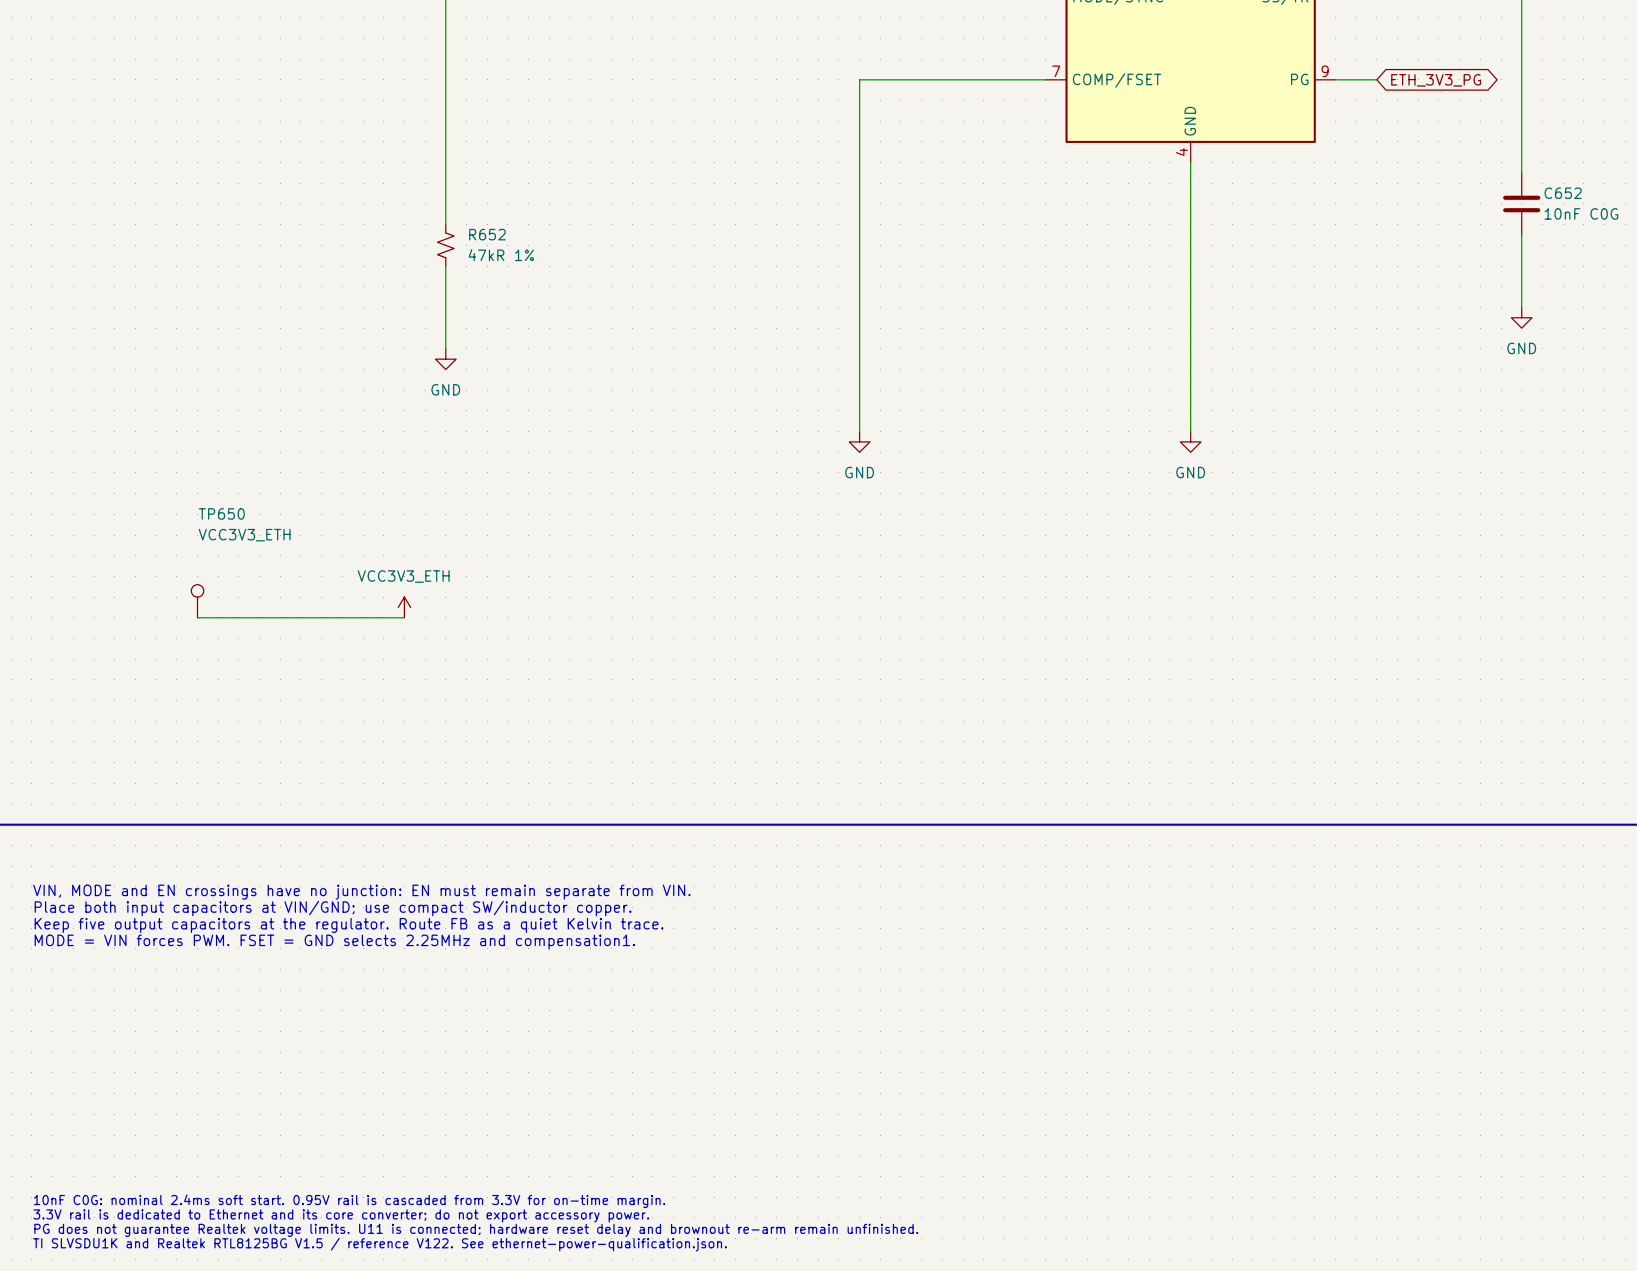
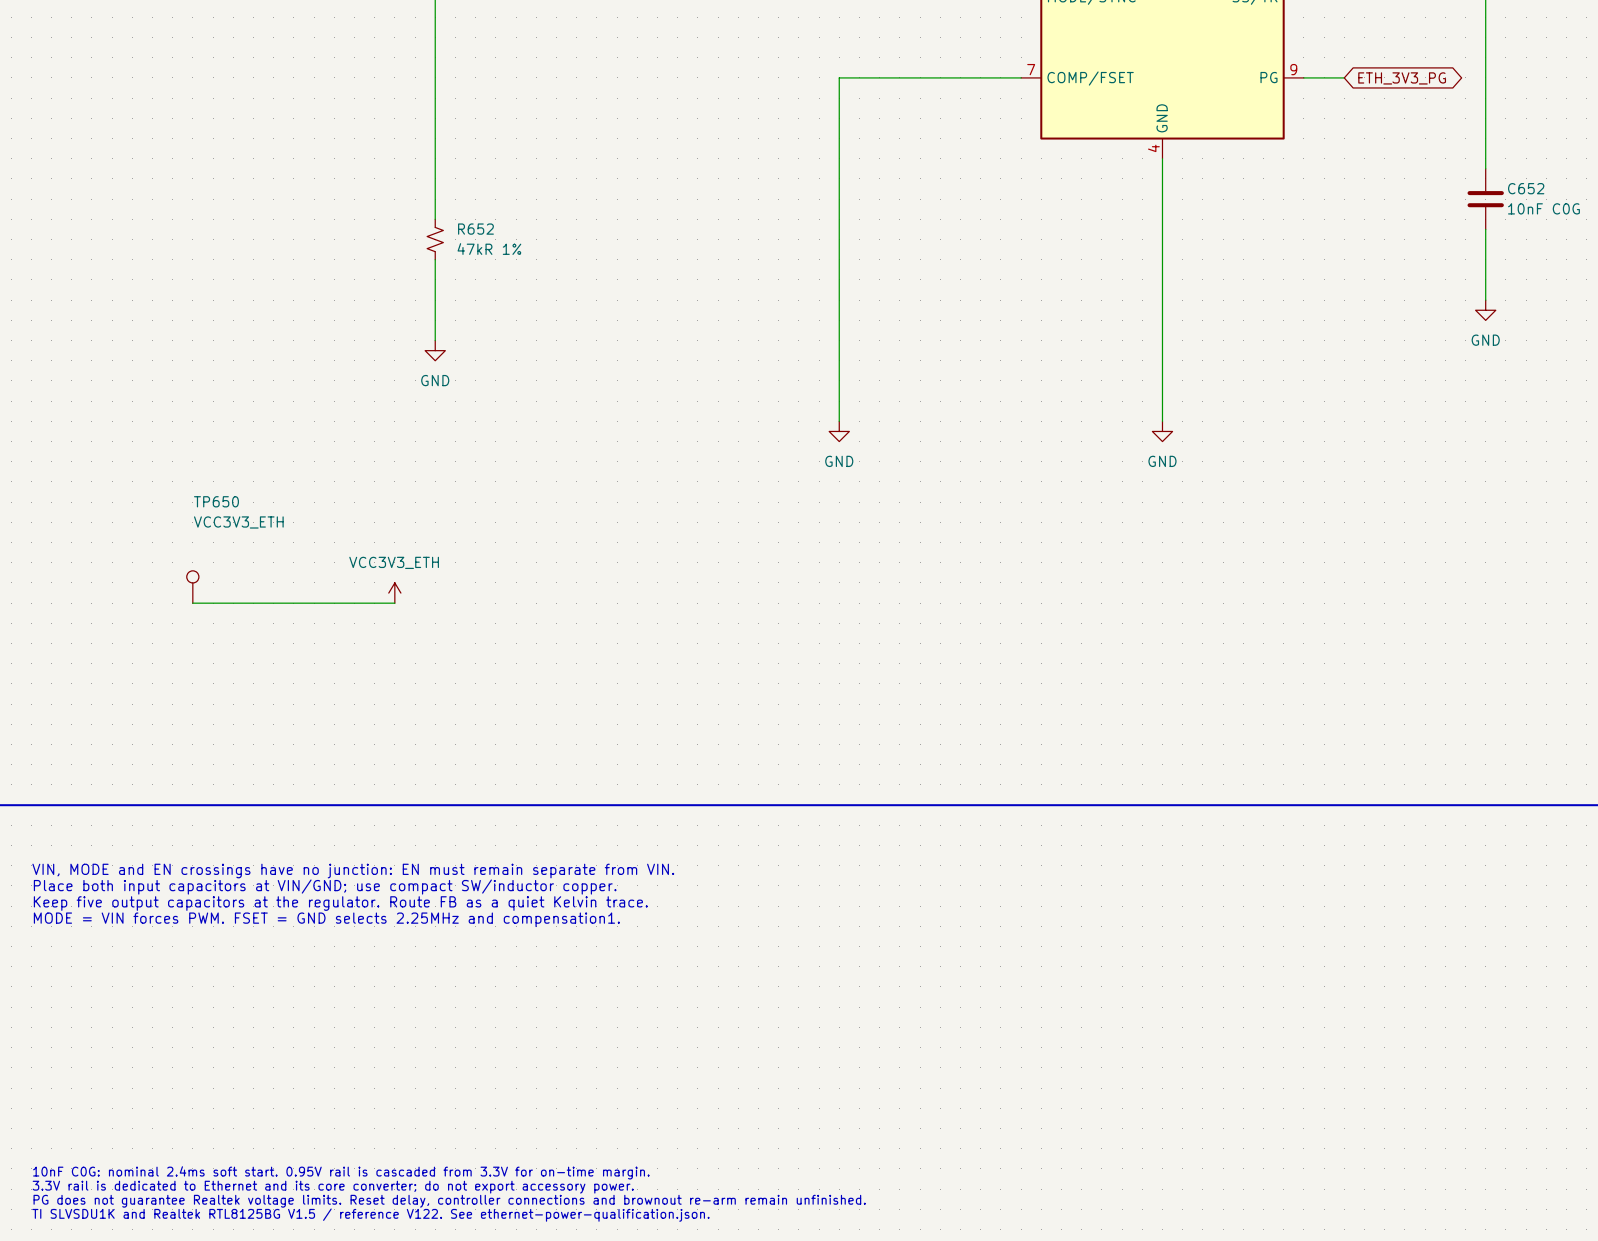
text: PG does not guarantee Realtek voltage limits. U11 is connected; hardware reset delay and brownout re-arm remain unfinished. (476, 1230) -> PG does not guarantee Realtek voltage limits. Reset delay, controller connections and brownout re-arm remain unfinished. (449, 1201)

